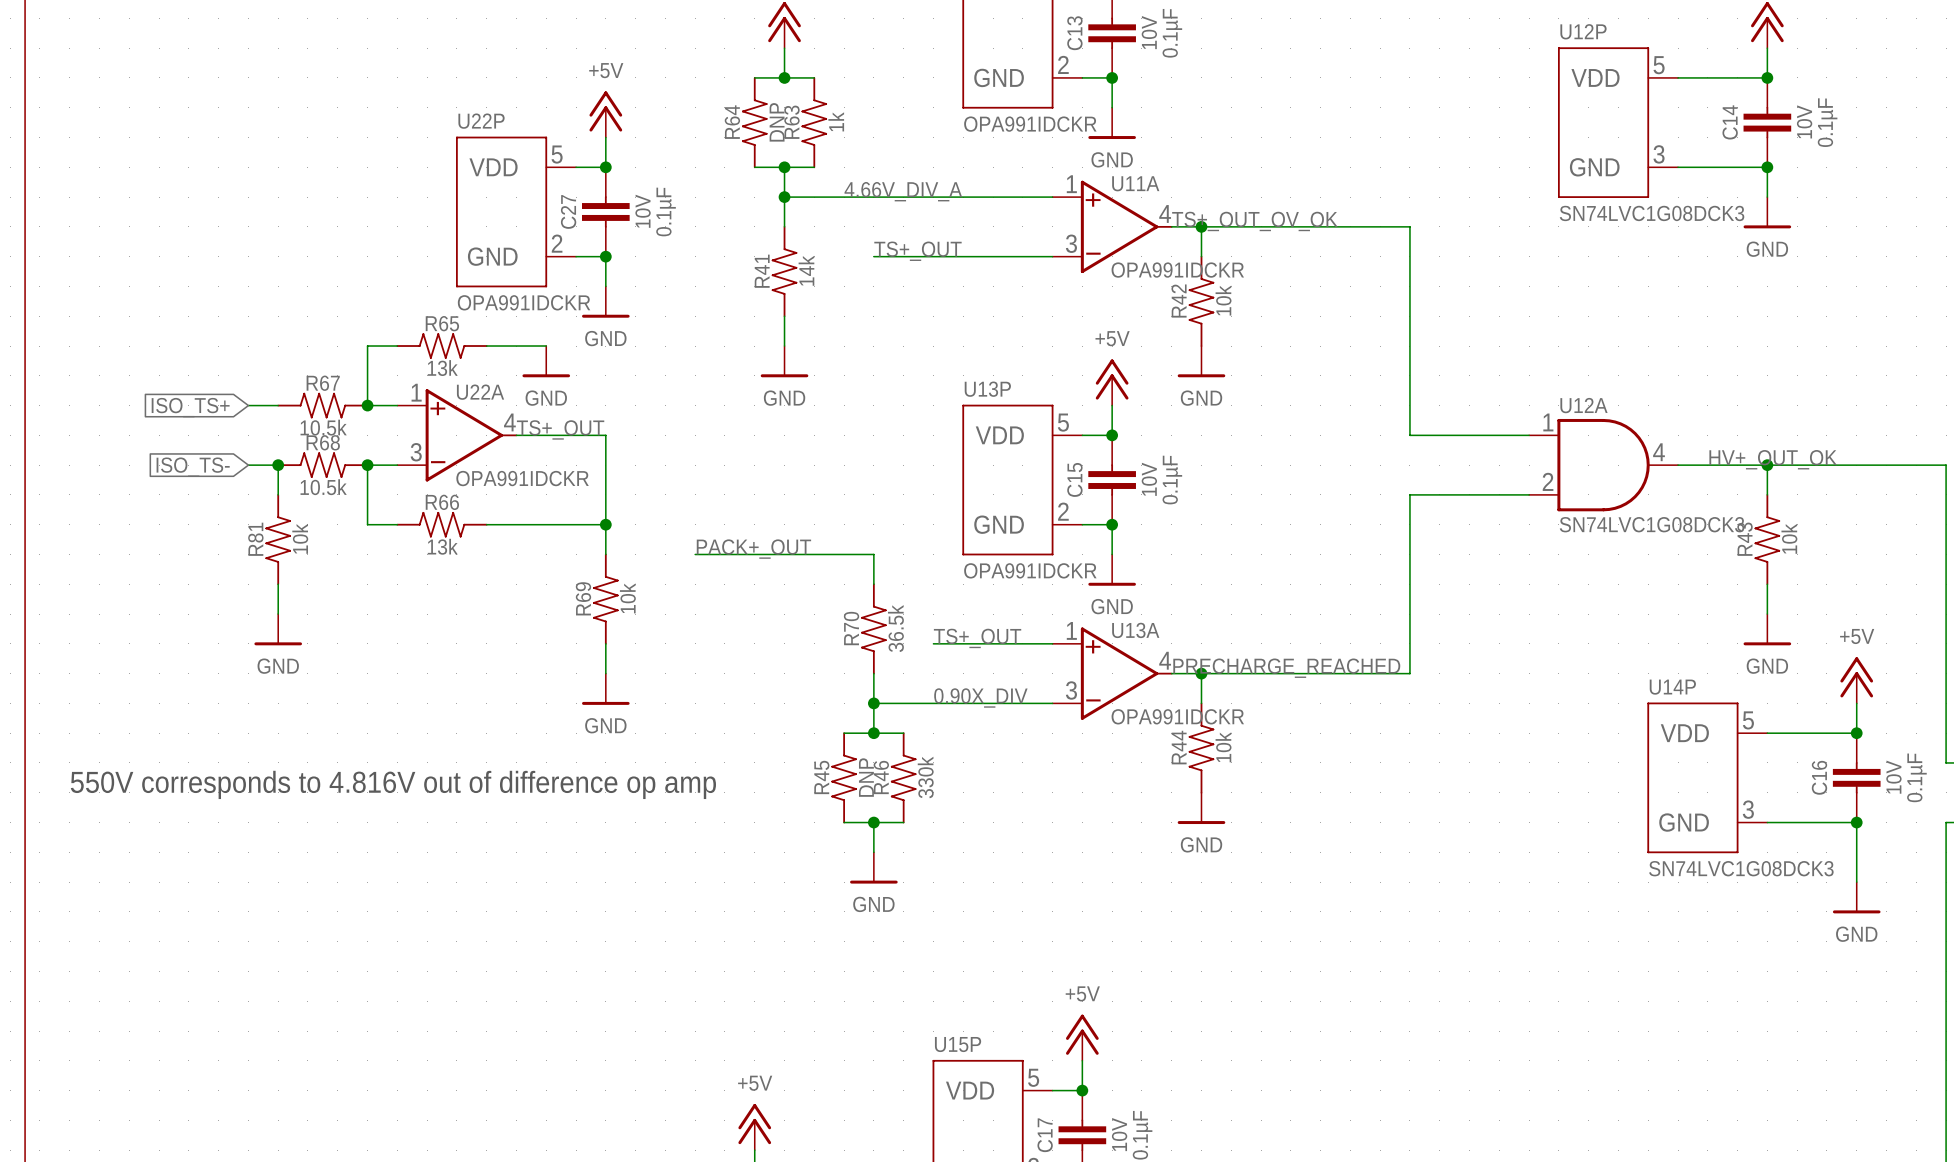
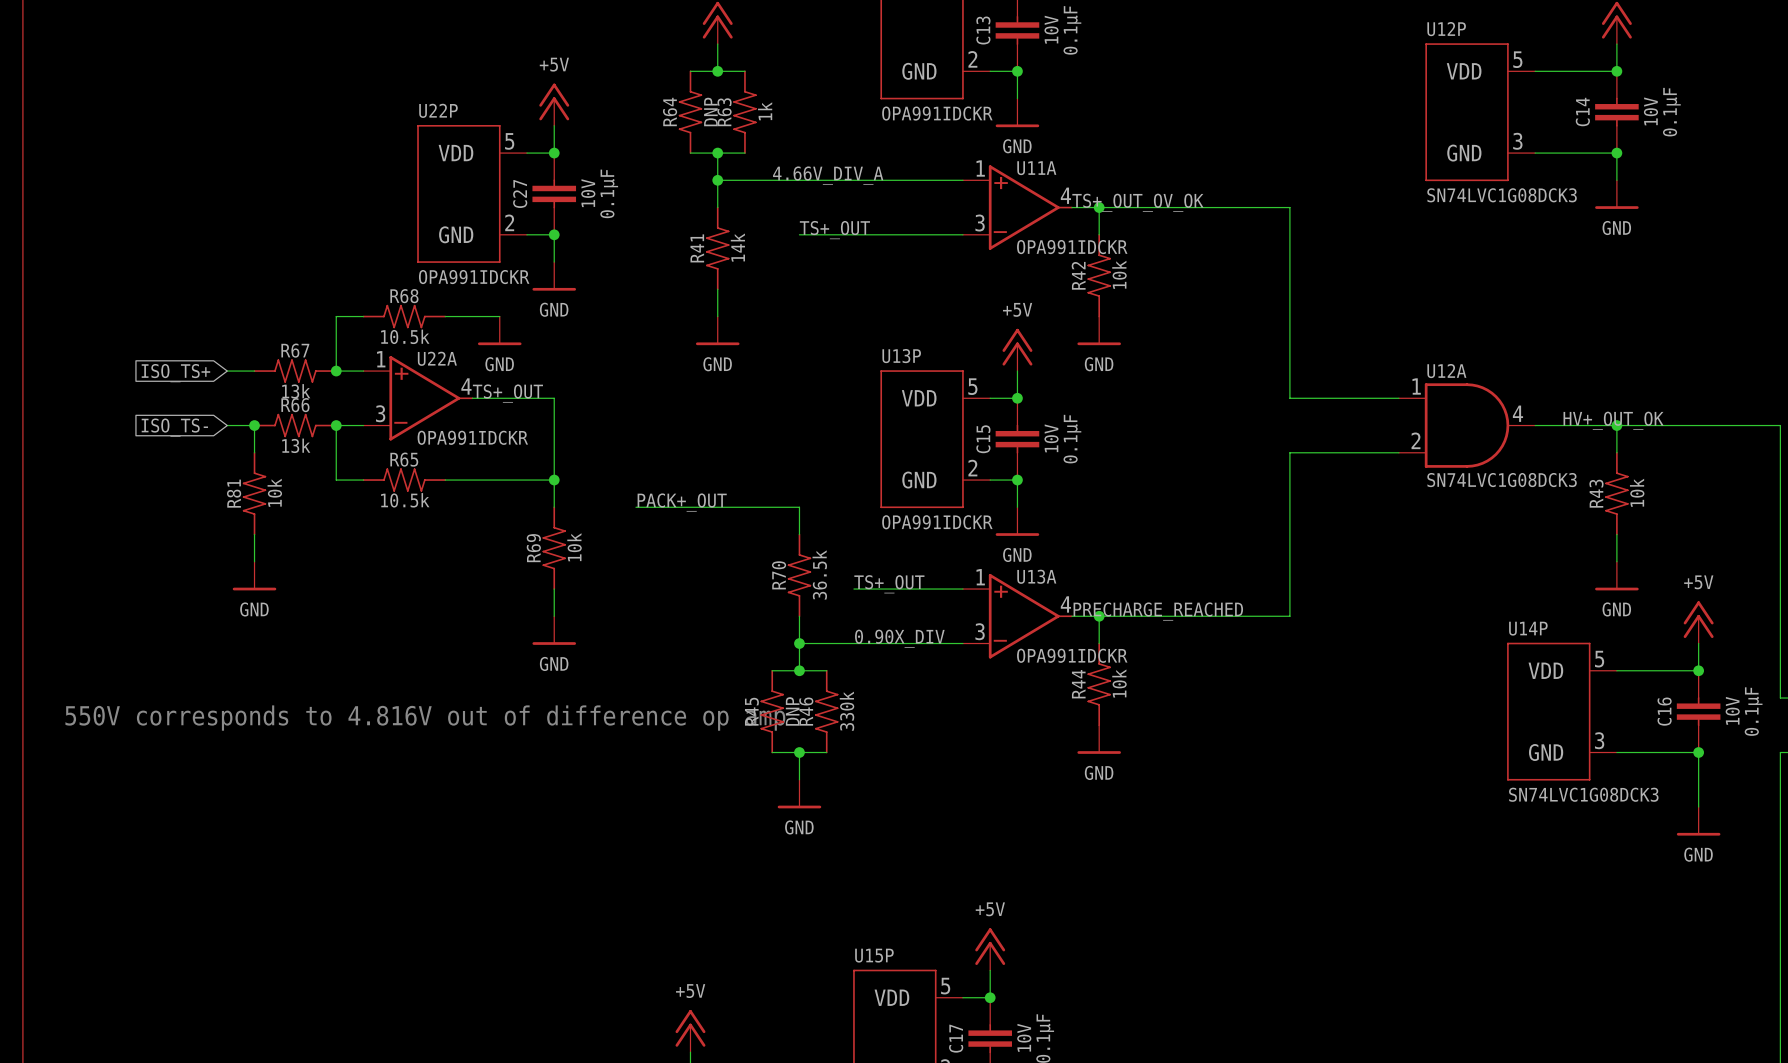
R65 name: R65 (442, 323) -> R68 (404, 296)
R65 text: 13k (442, 368) -> 10.5k (405, 336)
R67 text: 10.5k (323, 427) -> 13k (296, 391)
R68 name: R68 (323, 442) -> R66 (295, 405)
R68 text: 10.5k (323, 487) -> 13k (296, 445)
R66 name: R66 (442, 502) -> R65 (404, 459)
R66 text: 13k (442, 546) -> 10.5k (405, 500)

